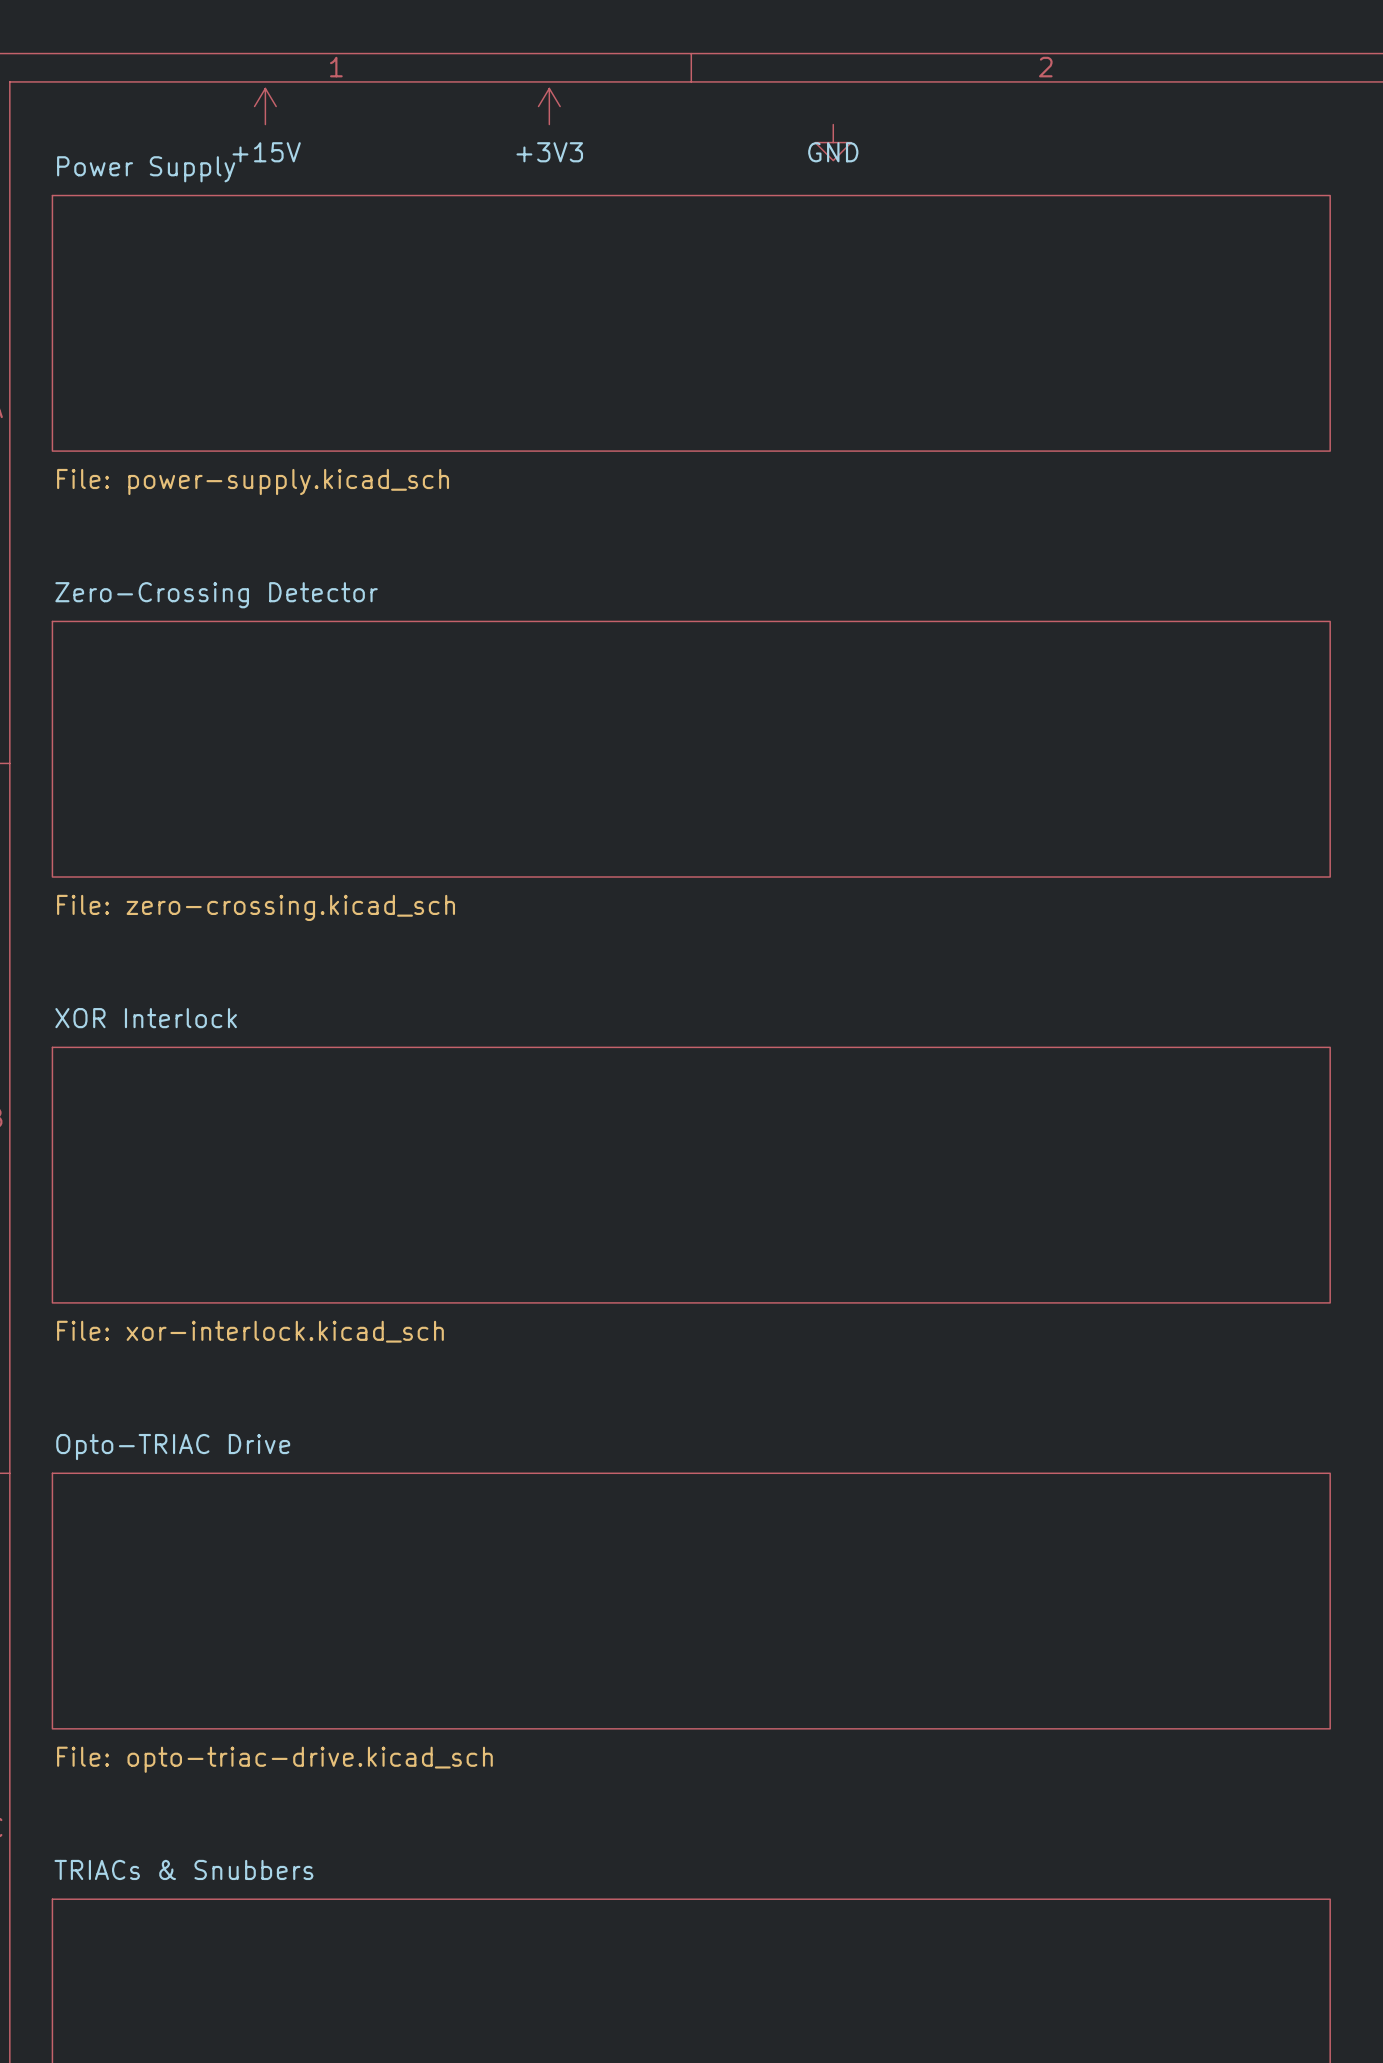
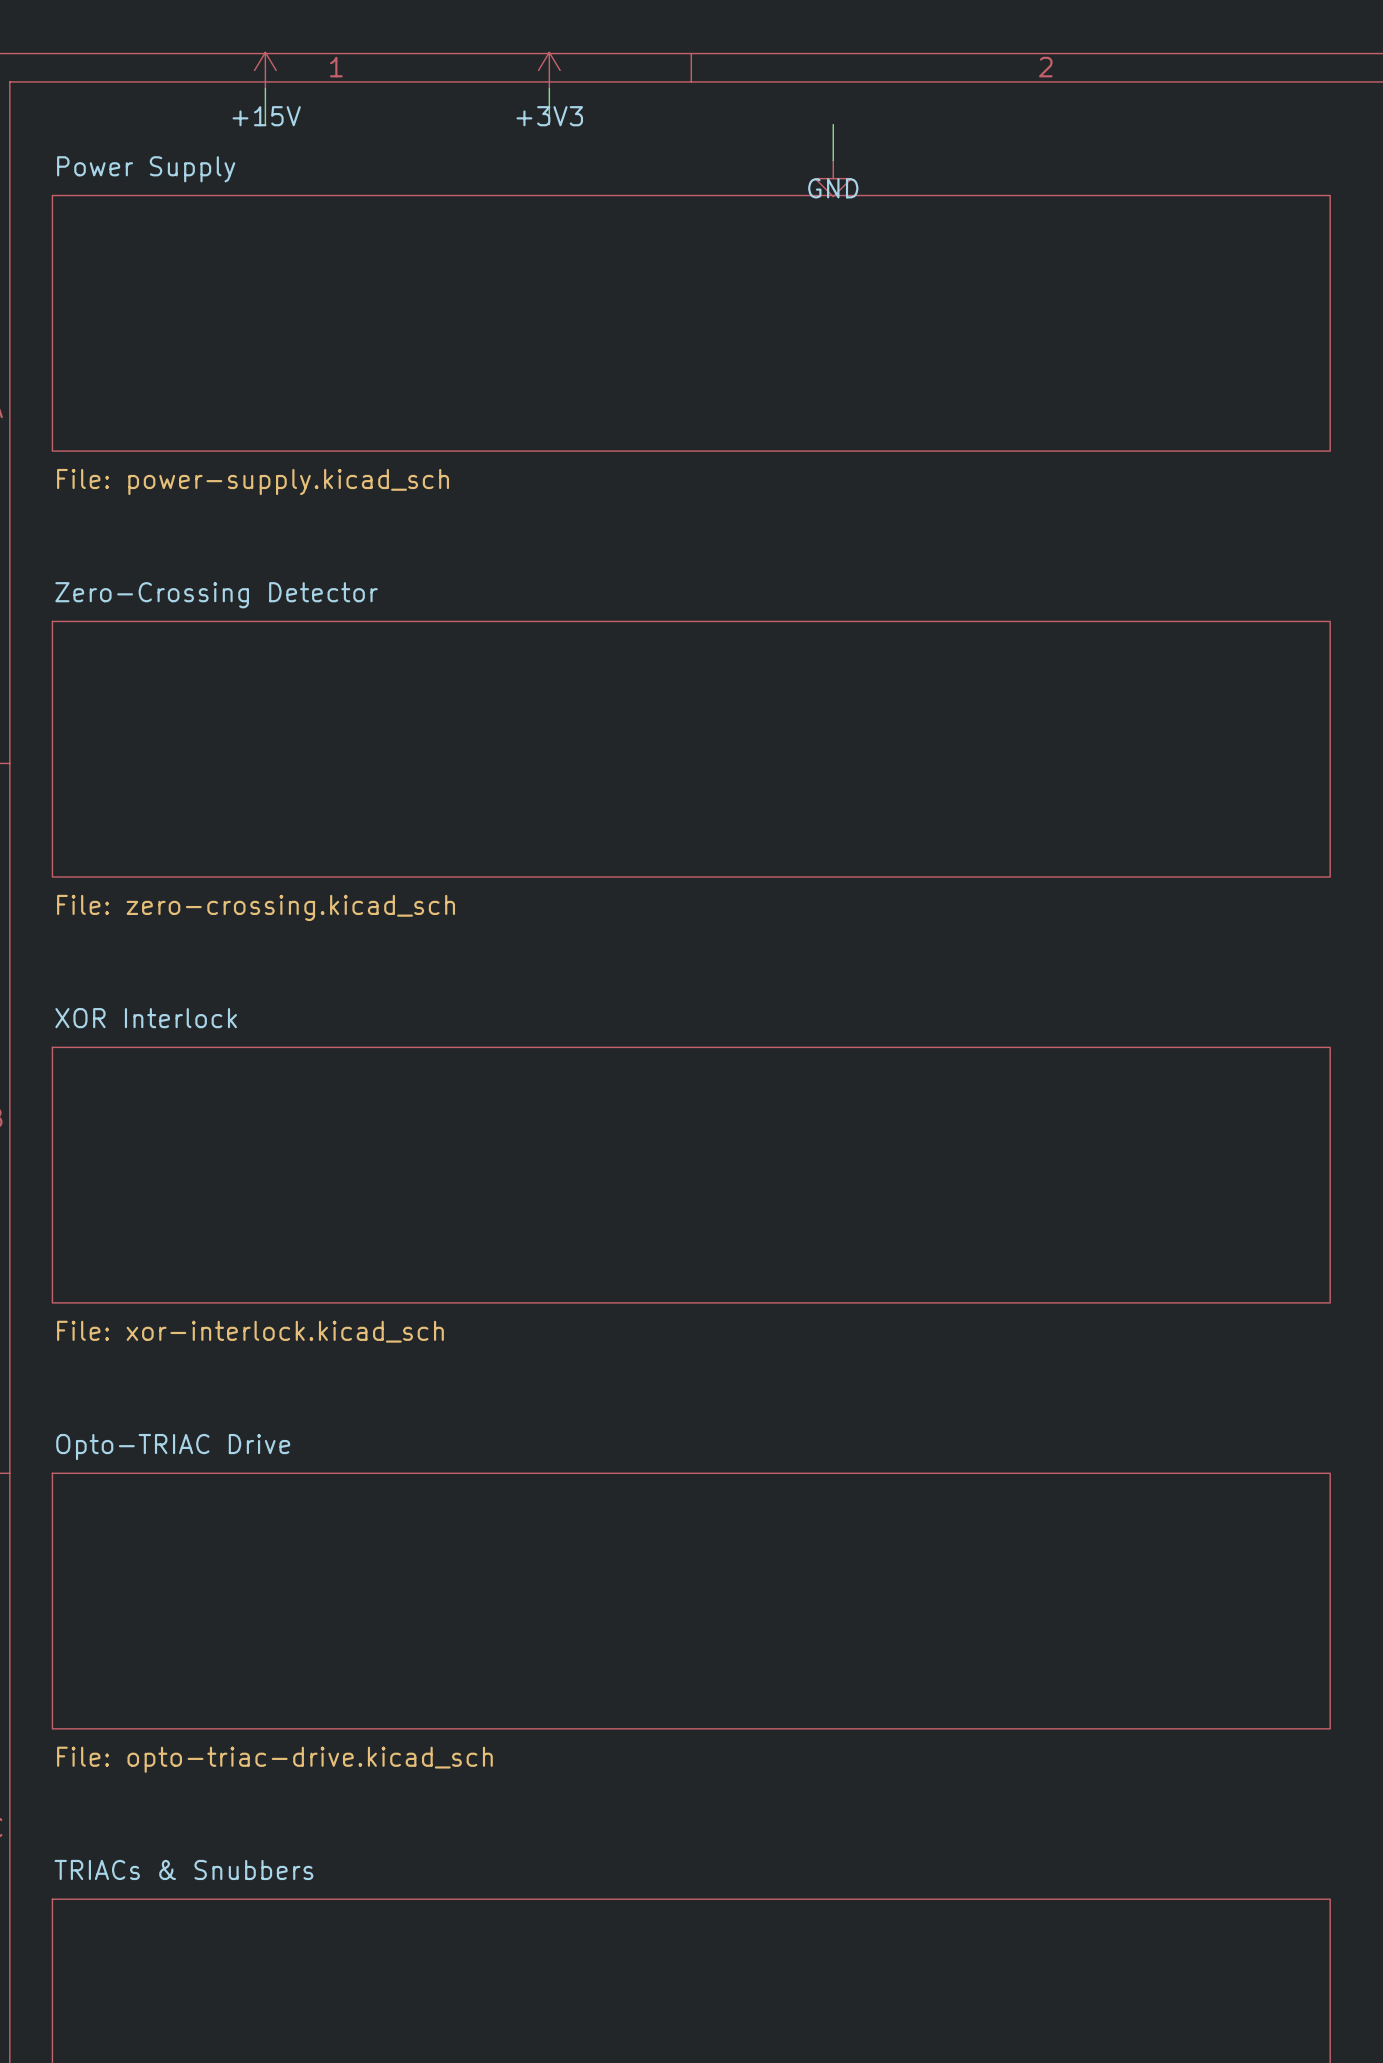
power symbol position: +15V (265, 106) -> +15V (265, 70)
power symbol position: +3V3 (549, 106) -> +3V3 (549, 70)
power symbol position: GND (833, 142) -> GND (833, 178)

